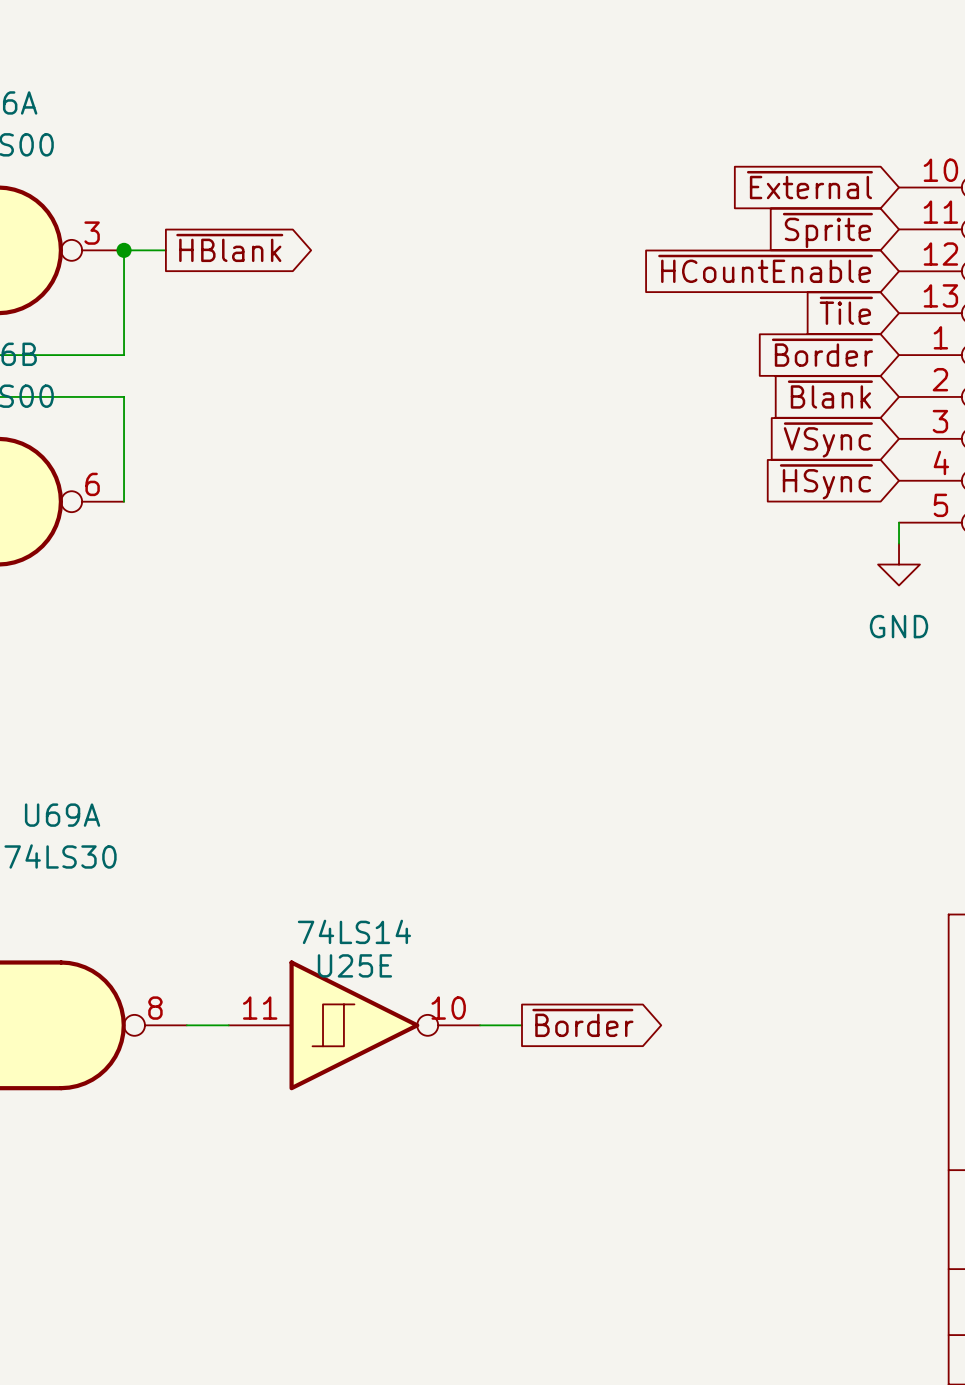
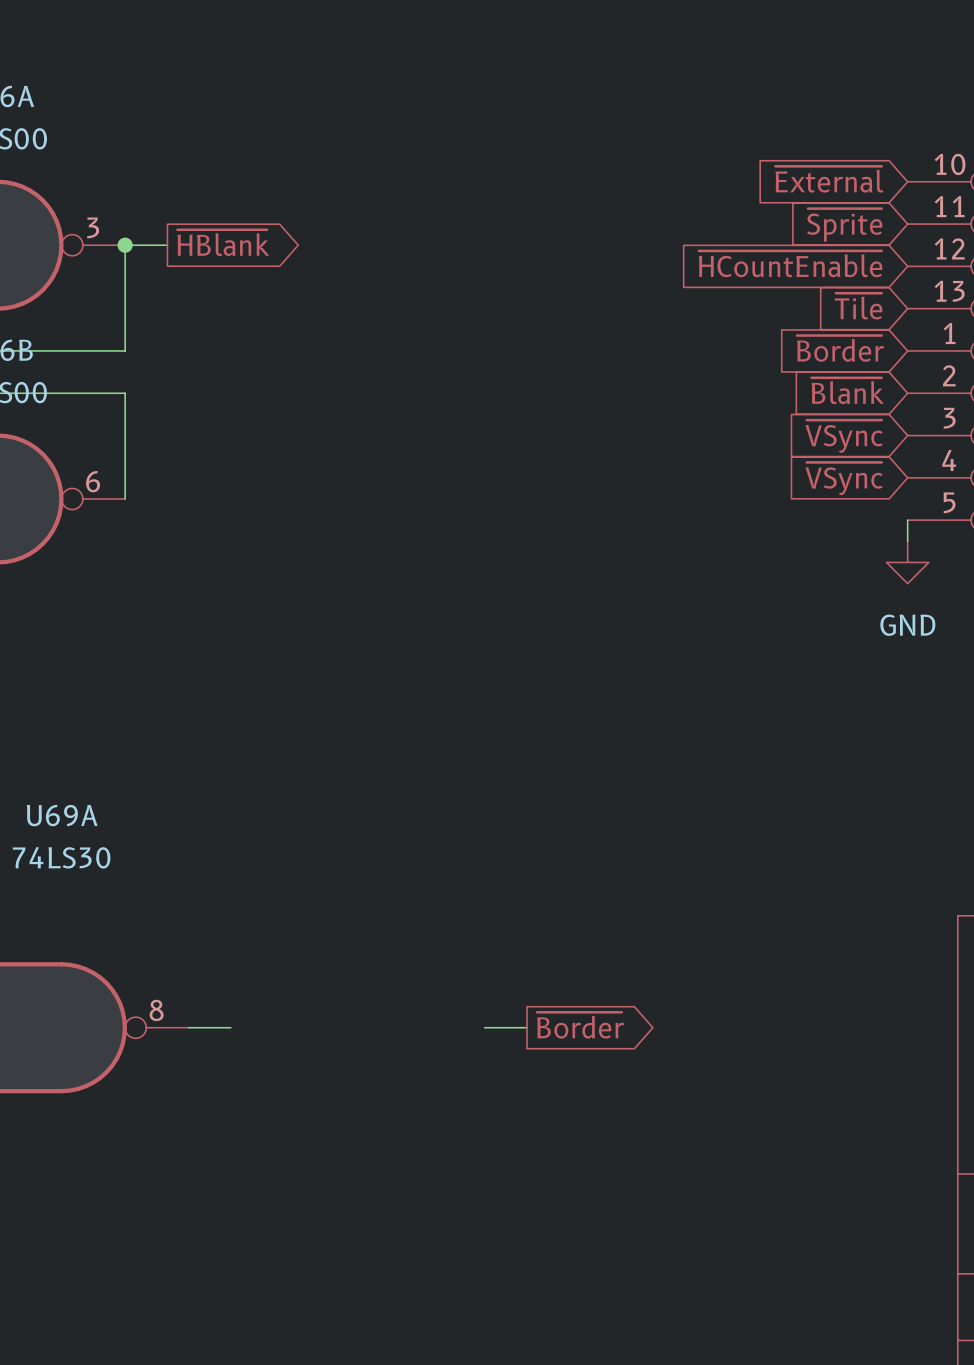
global label: ~{HSync} (826, 481) -> ~{VSync} (844, 478)
U25E: 74LS14 (354, 1025) -> none

